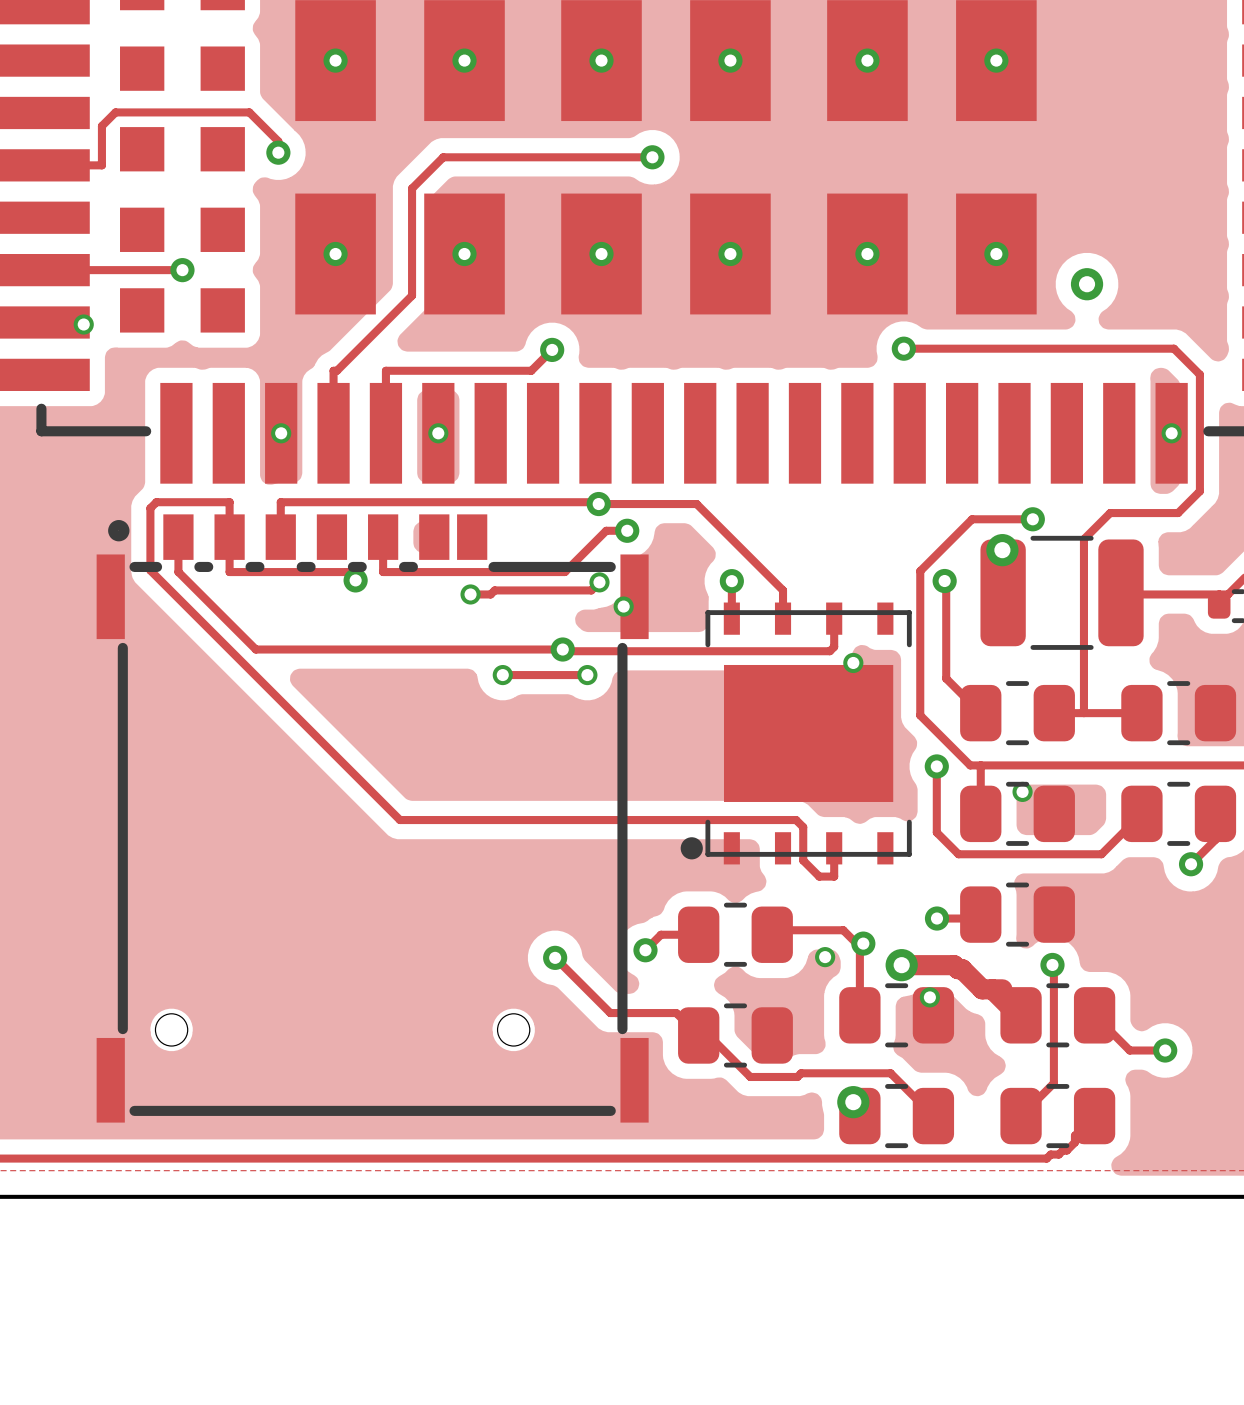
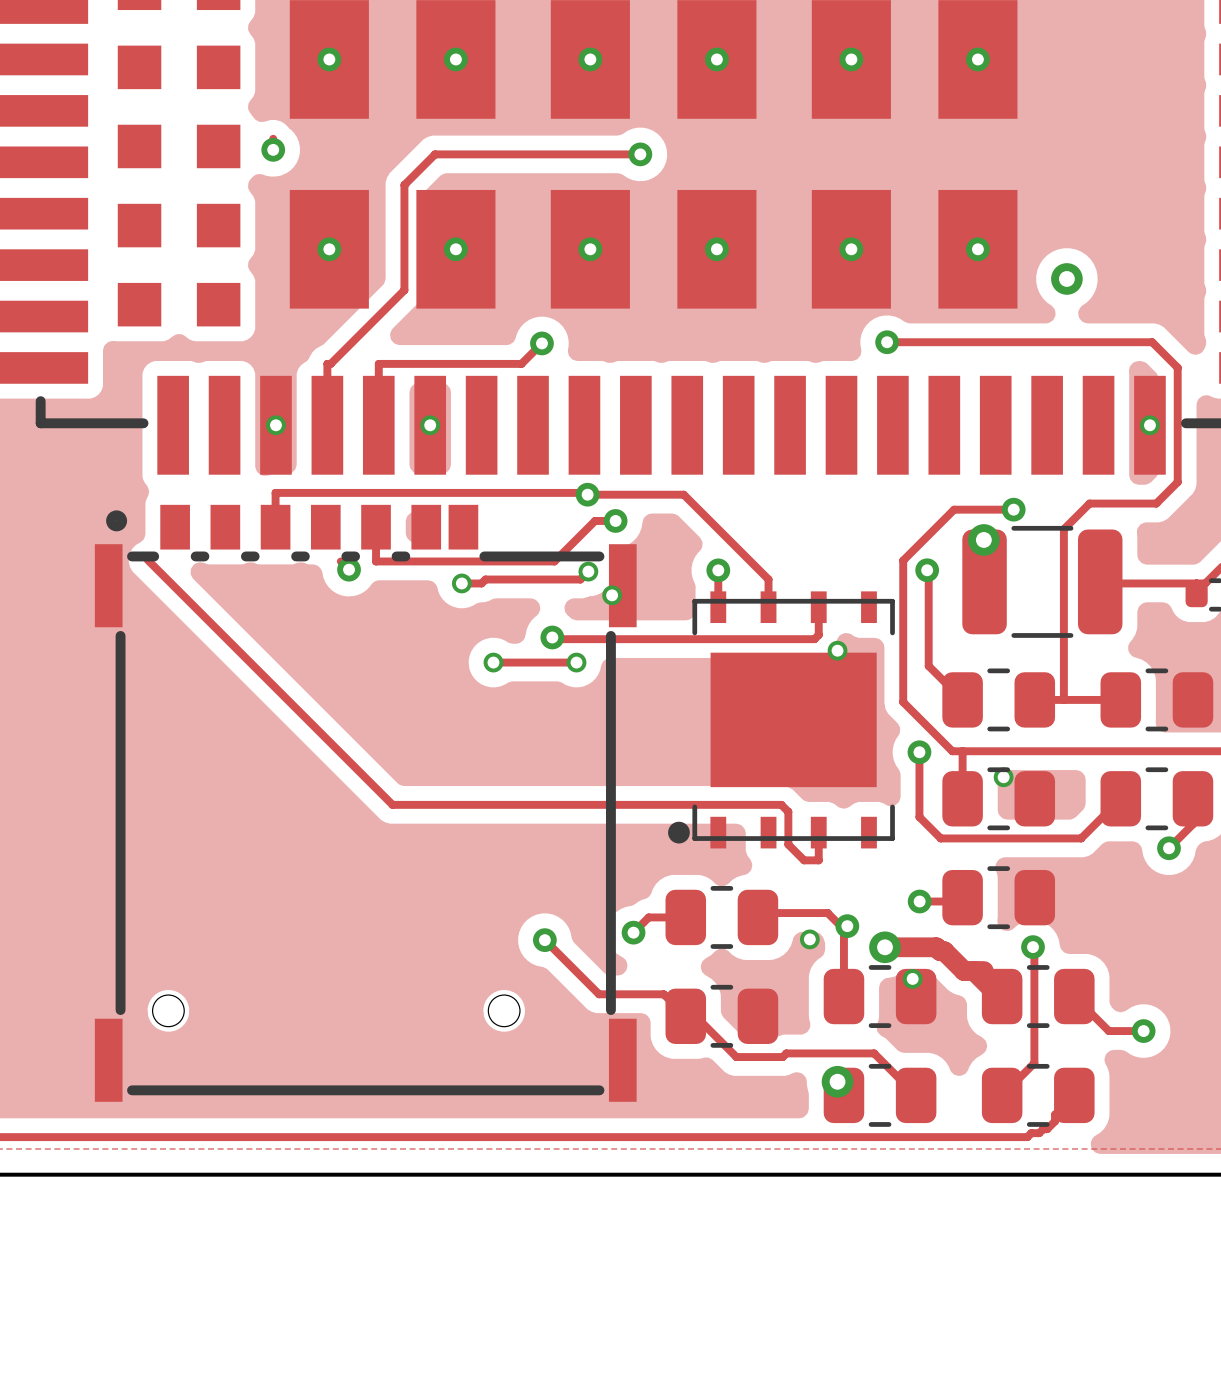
track: (278, 141) (249, 112) (115, 112) (101, 126) (101, 165) (39, 165) -> none
track: (39, 270) (182, 270) -> none
via: (182, 270) -> none
via: (83, 324) -> none
track: (178, 537) (178, 572) (255, 649) (562, 649) -> none
track: (150, 570) (150, 508) (156, 502) (229, 502) (229, 572) (347, 572) -> none

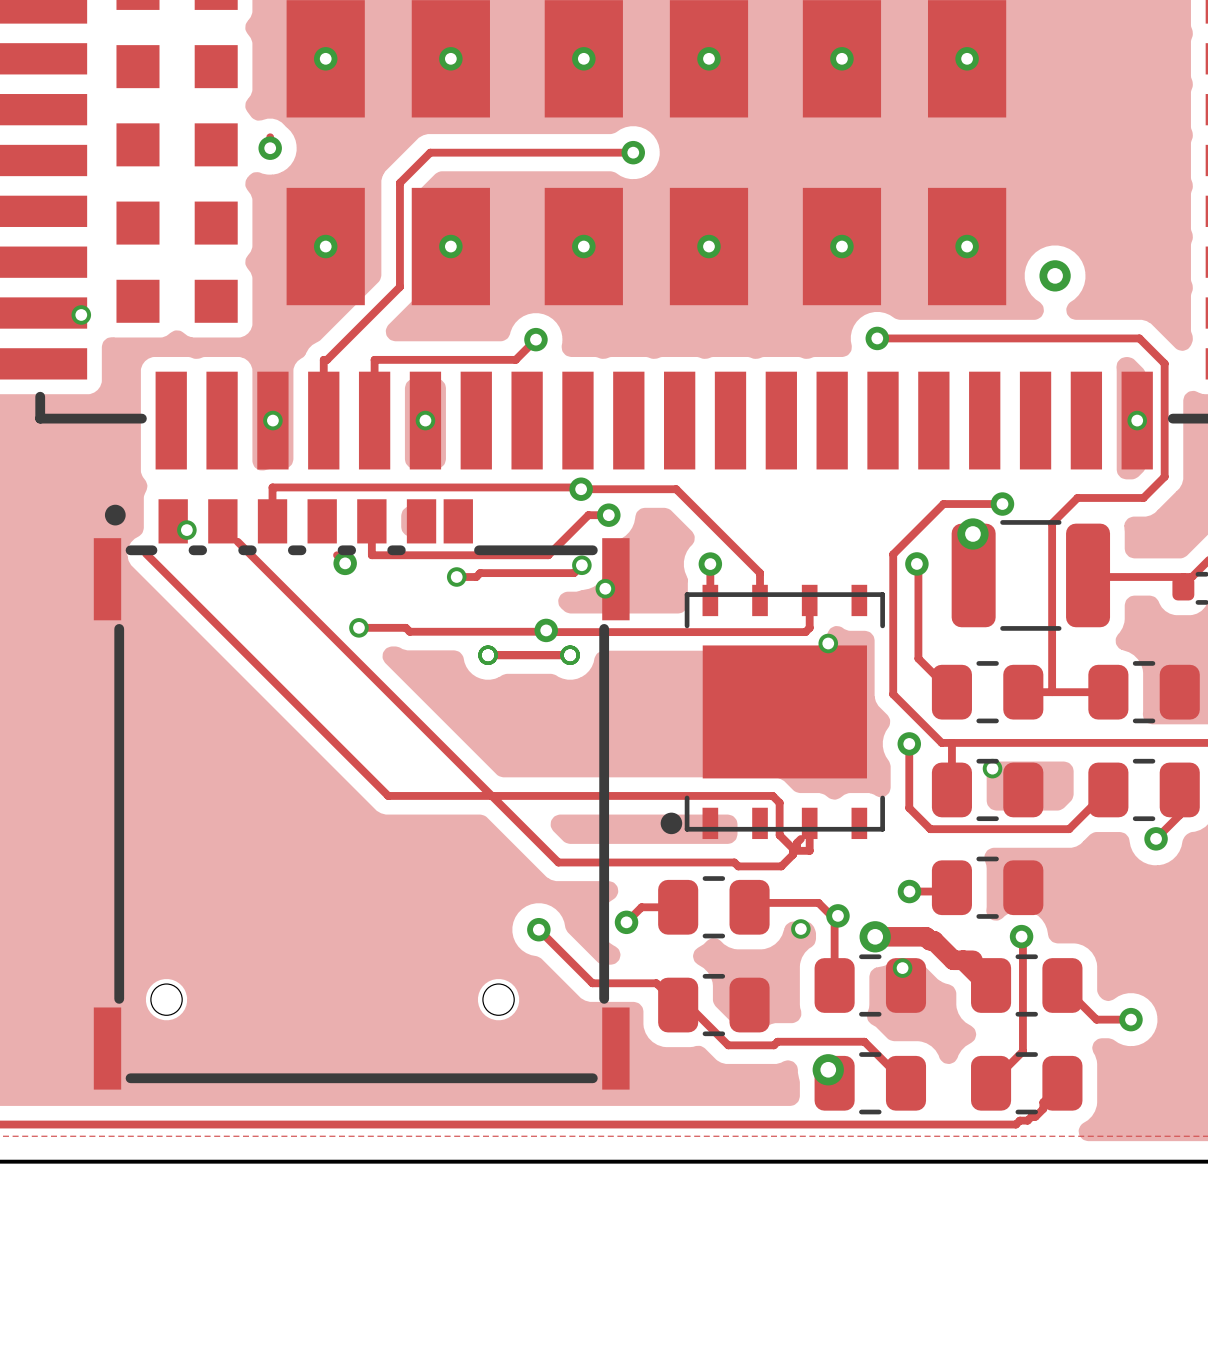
via: none -> (81, 314)
via: none -> (186, 530)
track: none -> (237, 541) (558, 862) (734, 862) (738, 866) (781, 866) (793, 854) (796, 842) (800, 839)
track: none -> (358, 627) (405, 627) (409, 631) (546, 631)
via: none -> (358, 627)

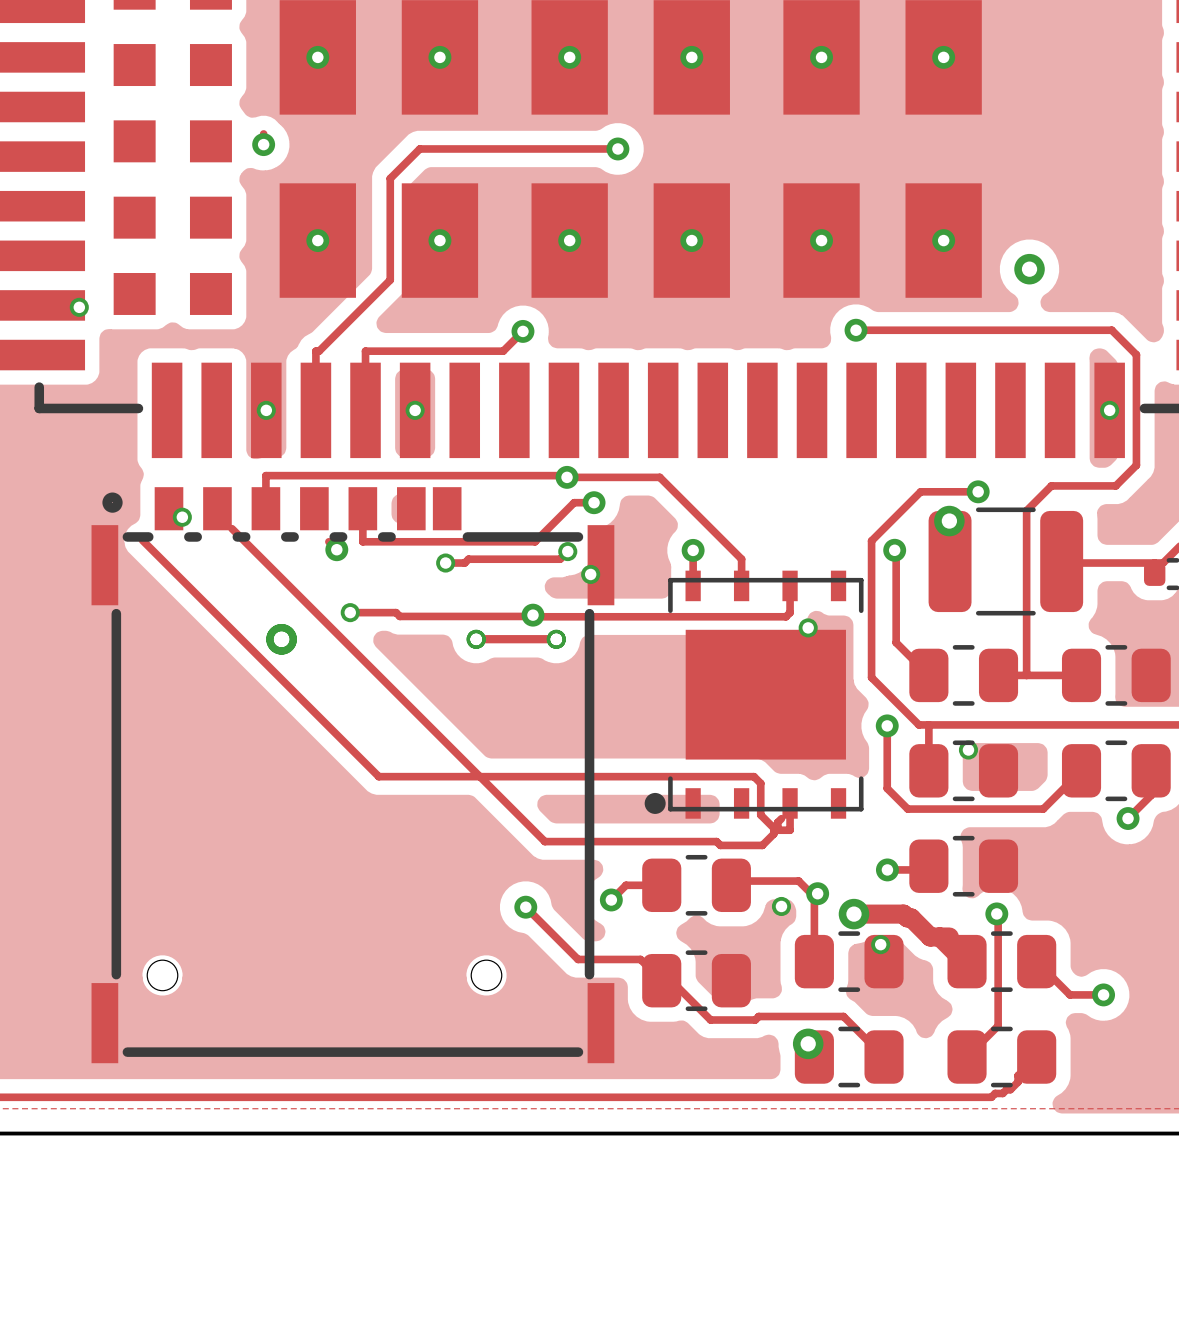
via: none -> (281, 639)

